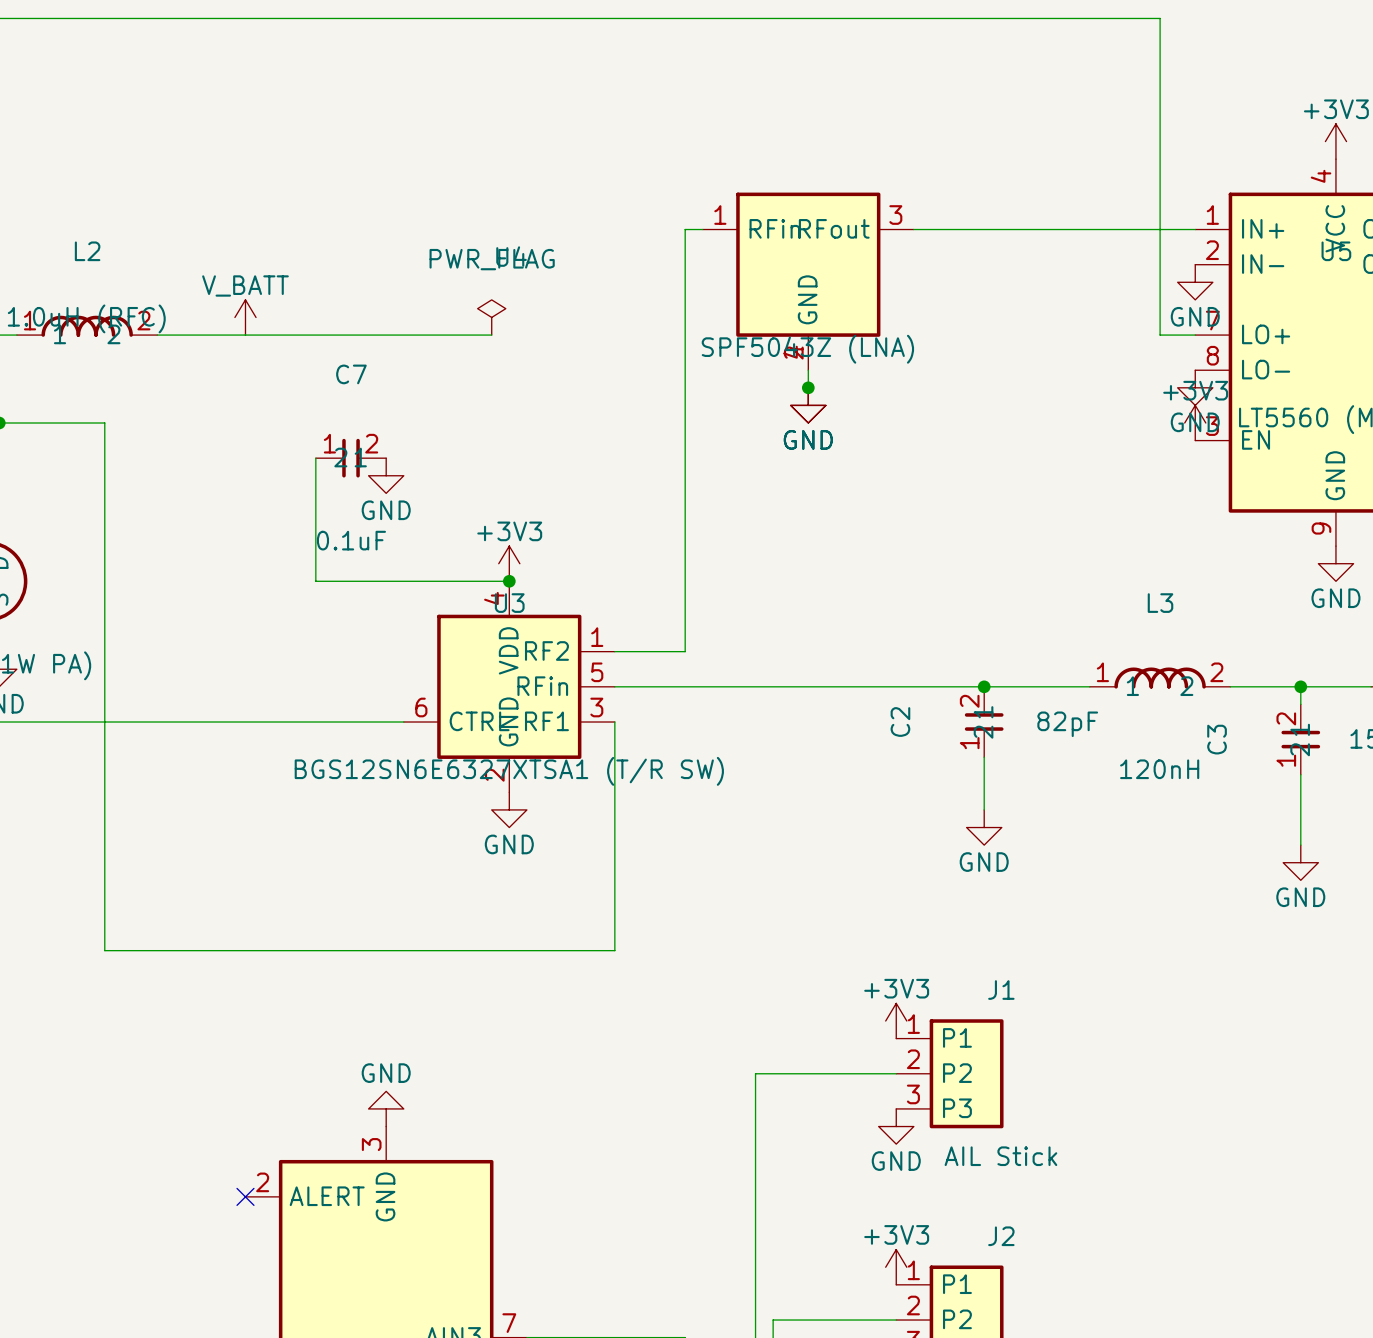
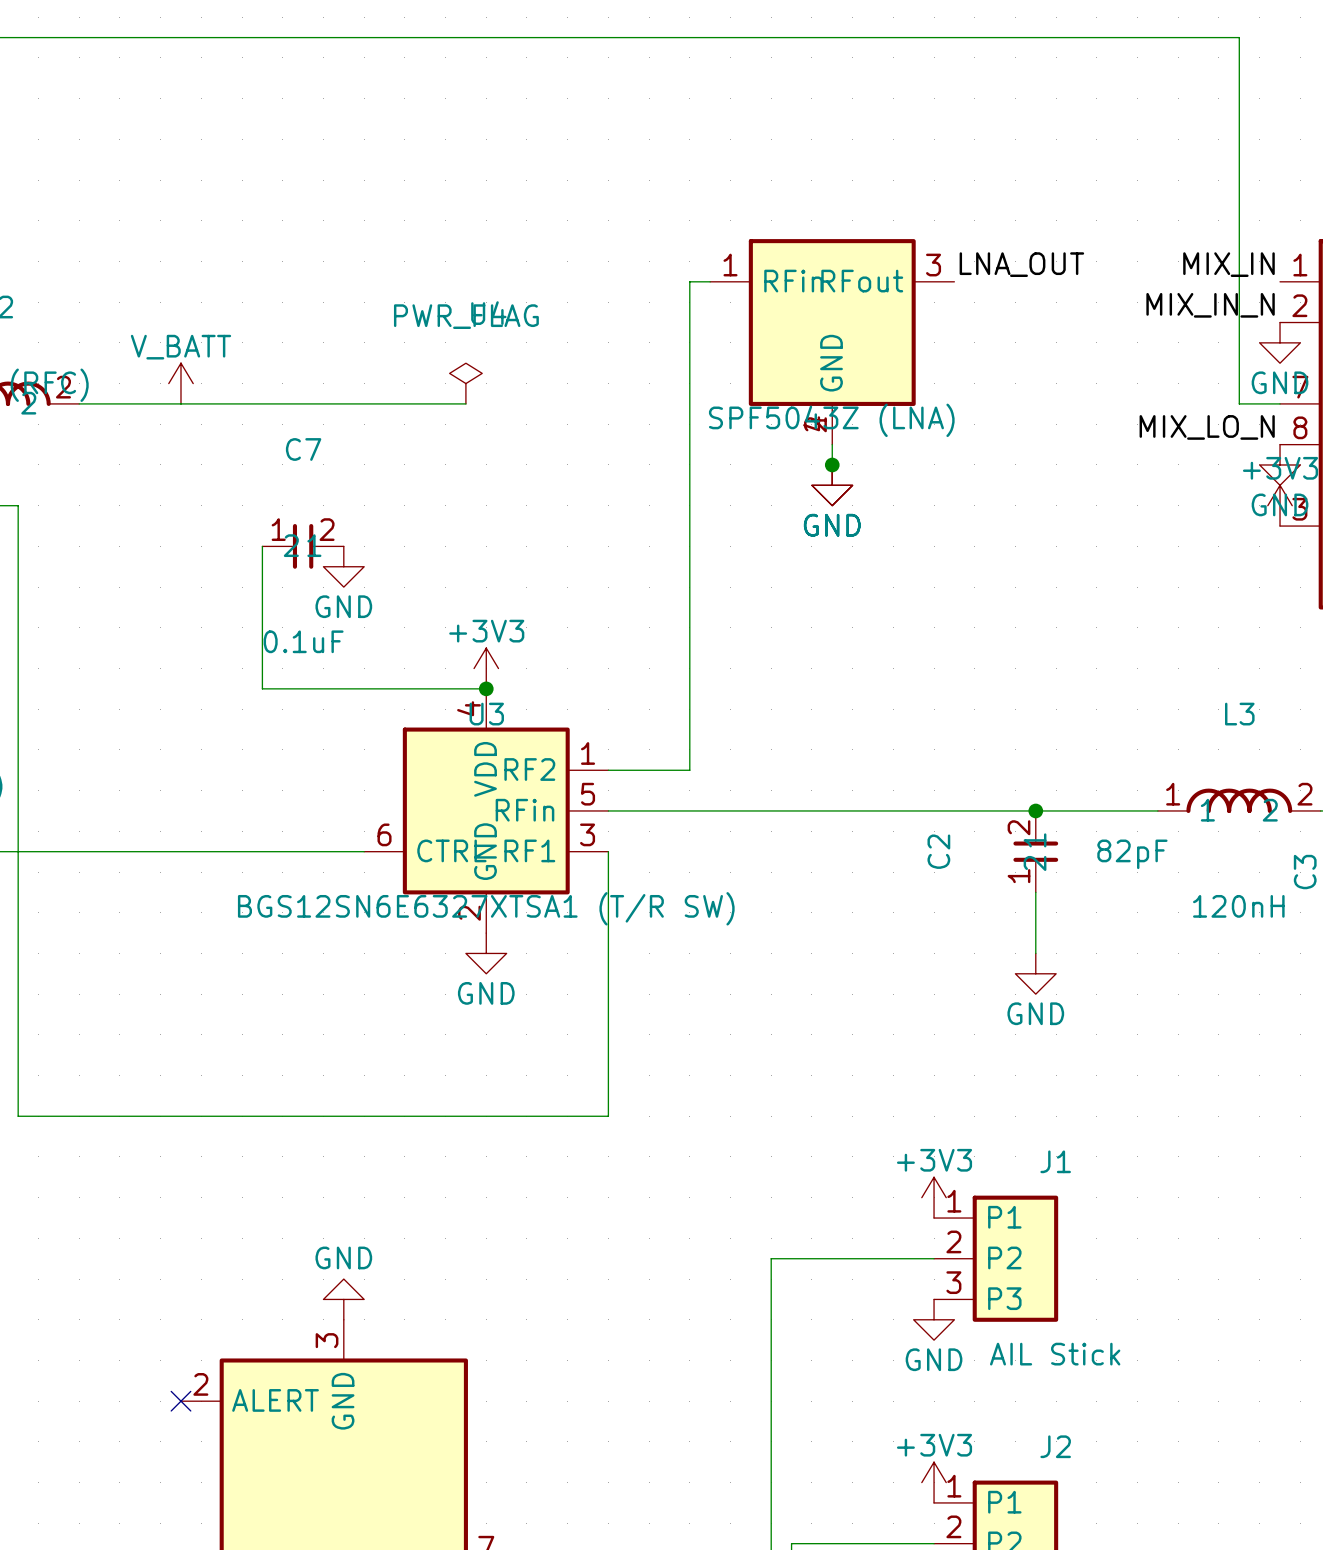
label: none -> LNA_OUT (1021, 264)
label: none -> MIX_IN (1228, 264)
wire: (913, 229) (1195, 229) -> none
label: none -> MIX_IN_N (1210, 305)
label: none -> MIX_LO_N (1207, 427)

